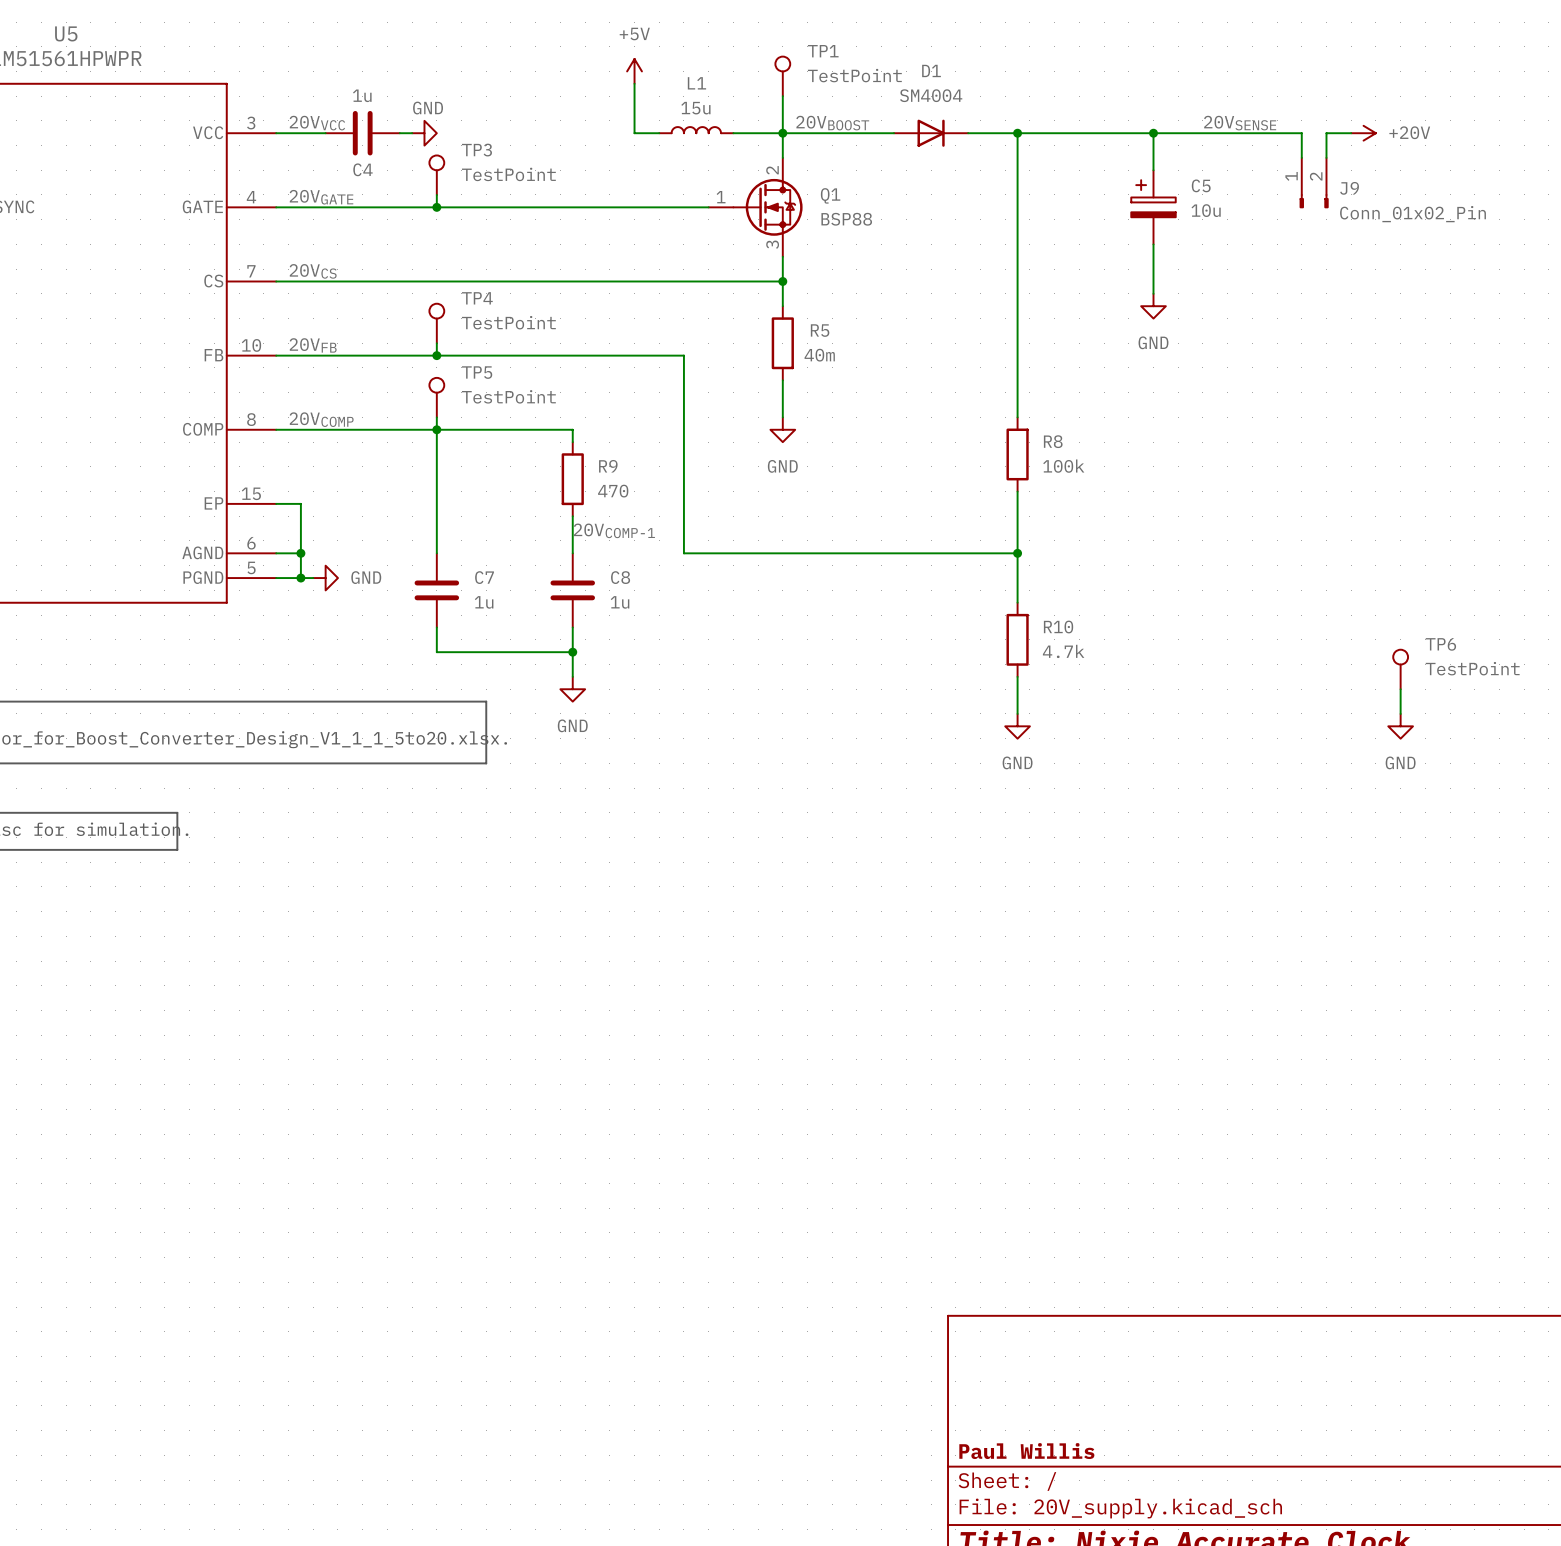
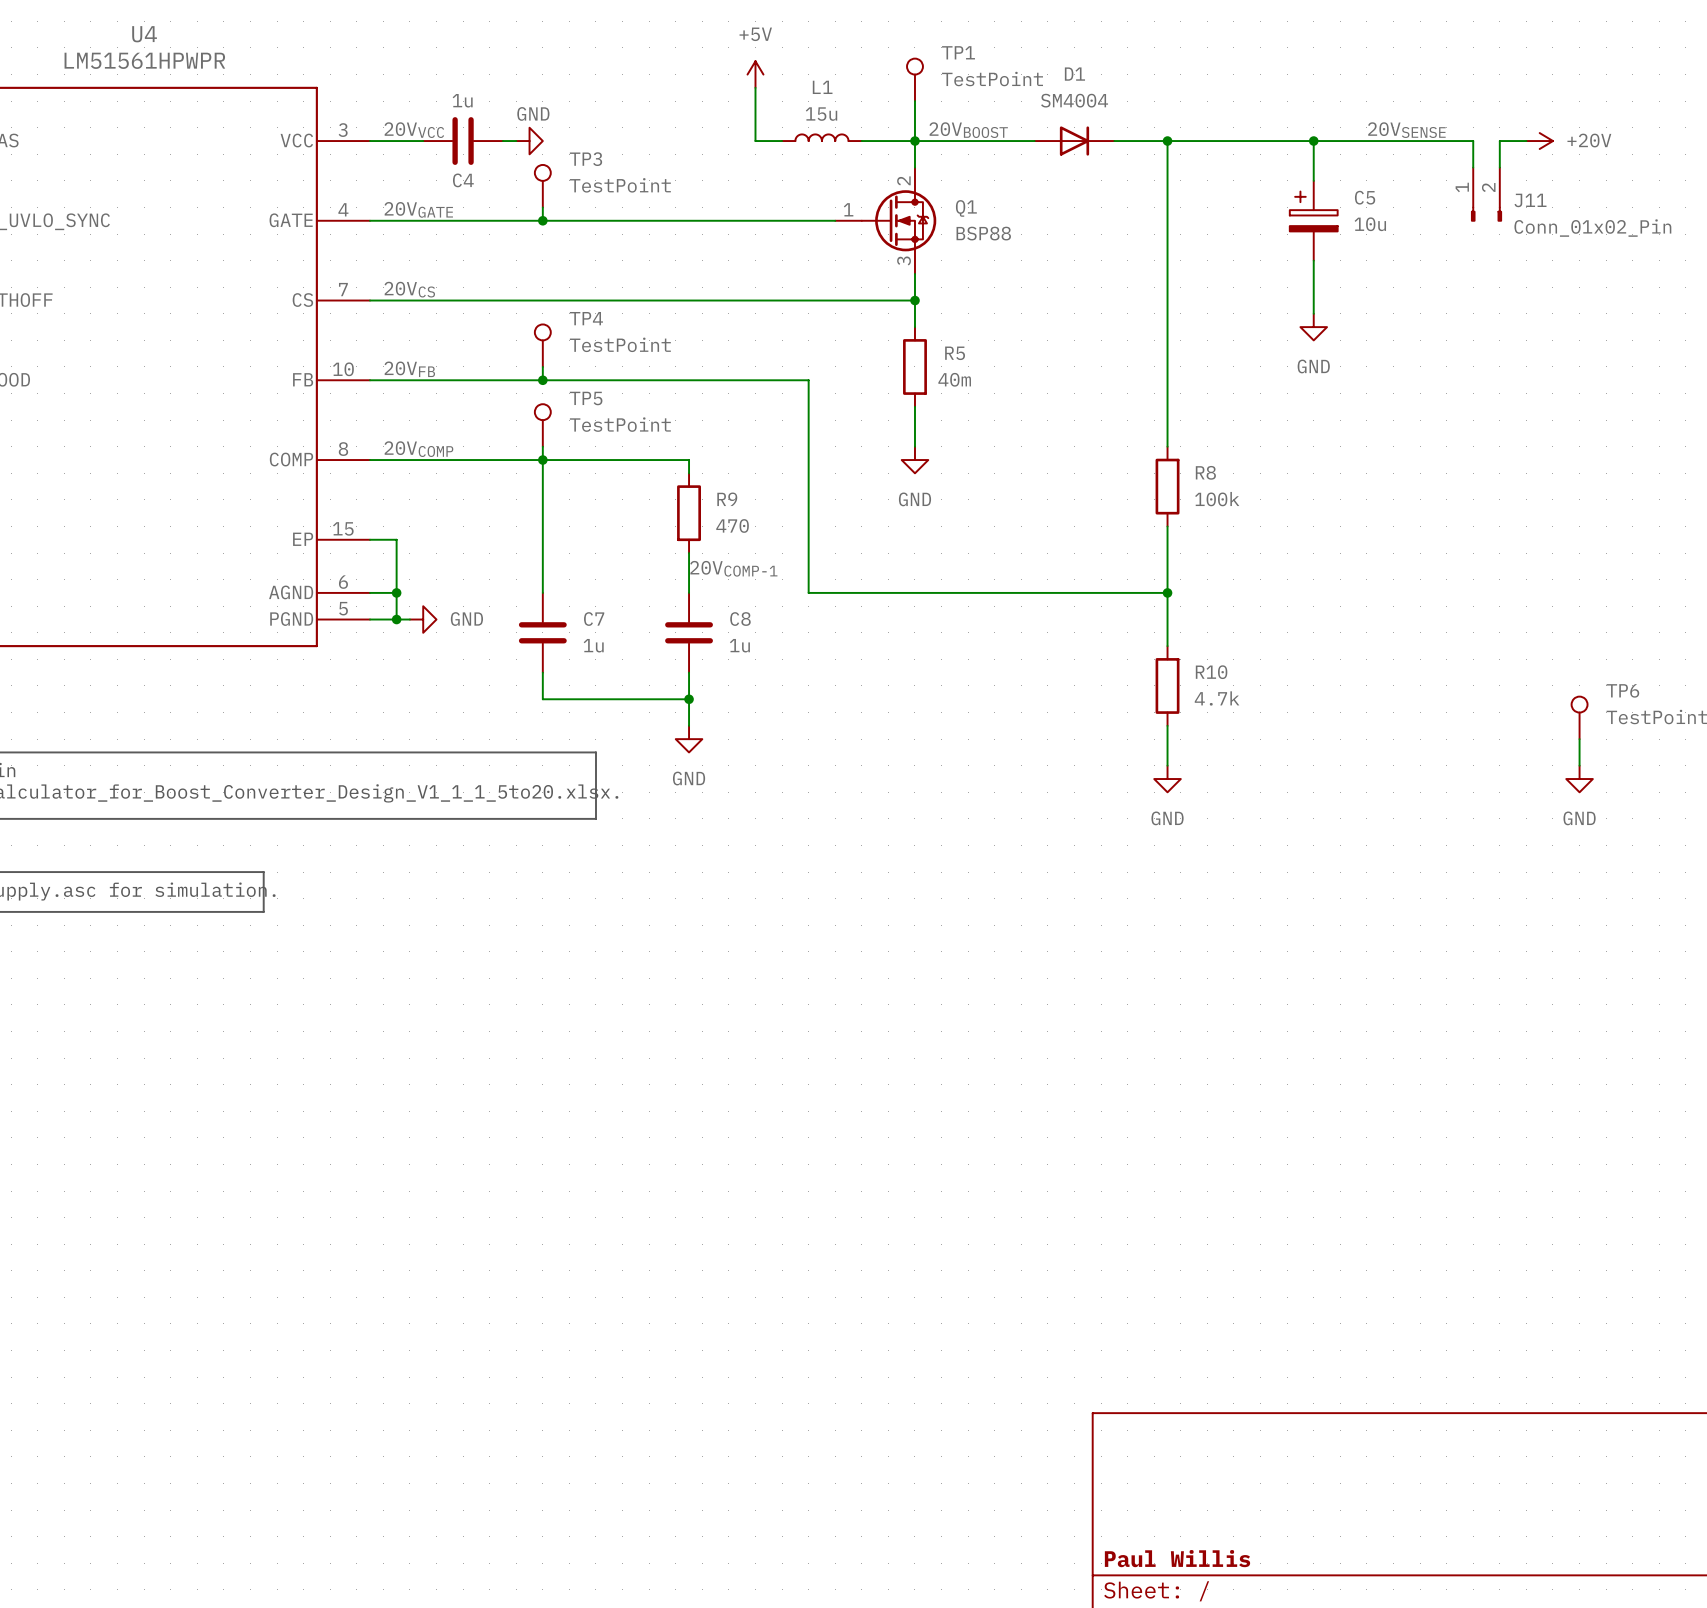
U5 name: U5 (66, 33) -> U4 (144, 34)
J9 name: J9 (1349, 188) -> J11 (1530, 200)

